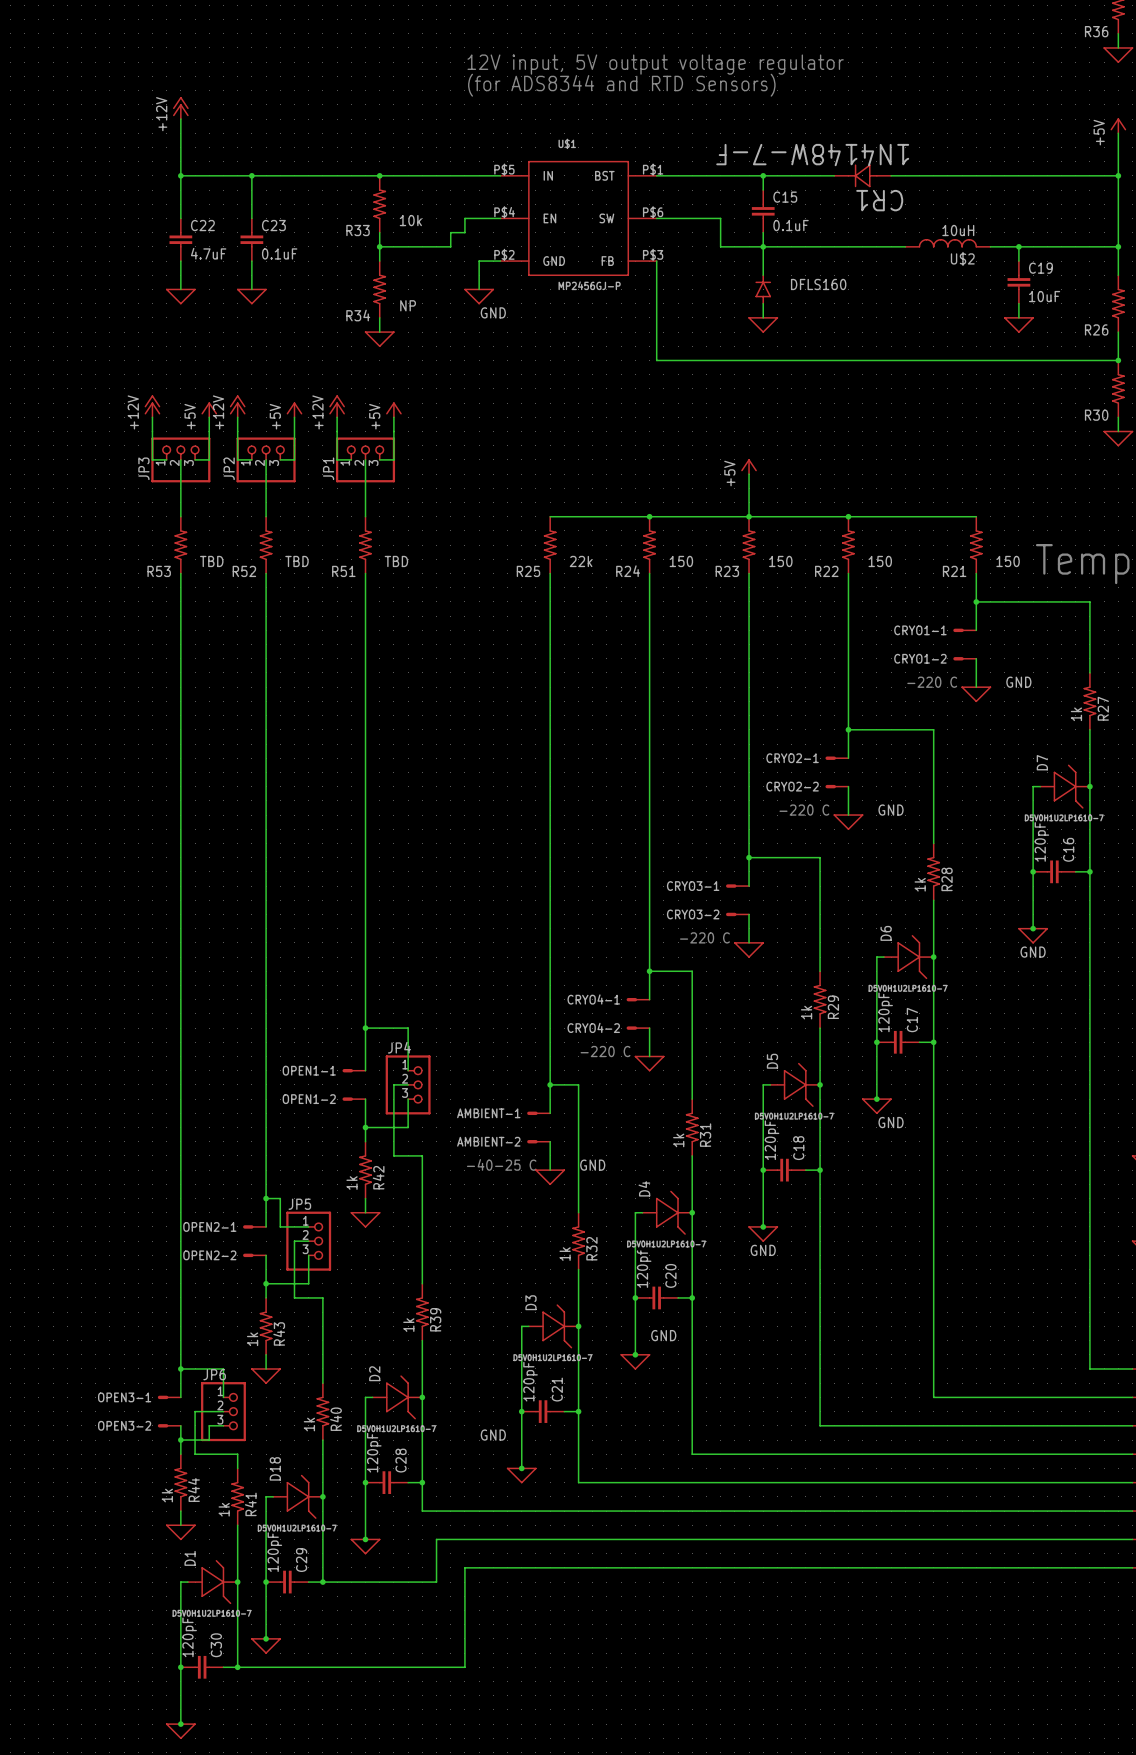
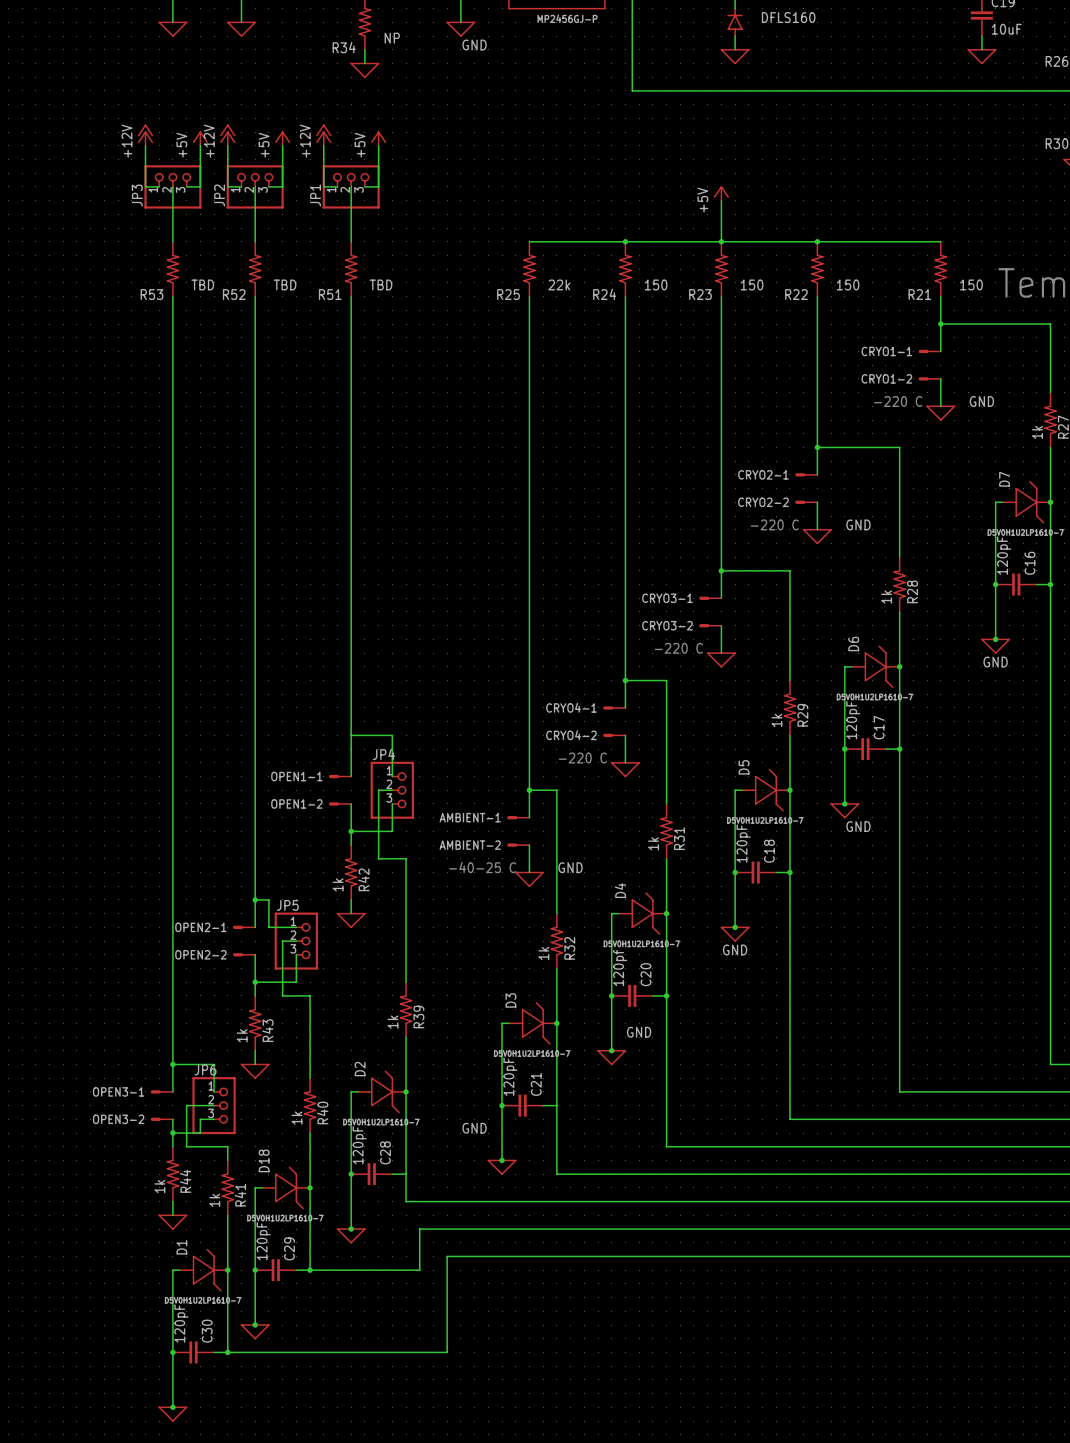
junction: (365, 1028) -> none
junction: (578, 1411) -> none
junction: (422, 1482) -> none

